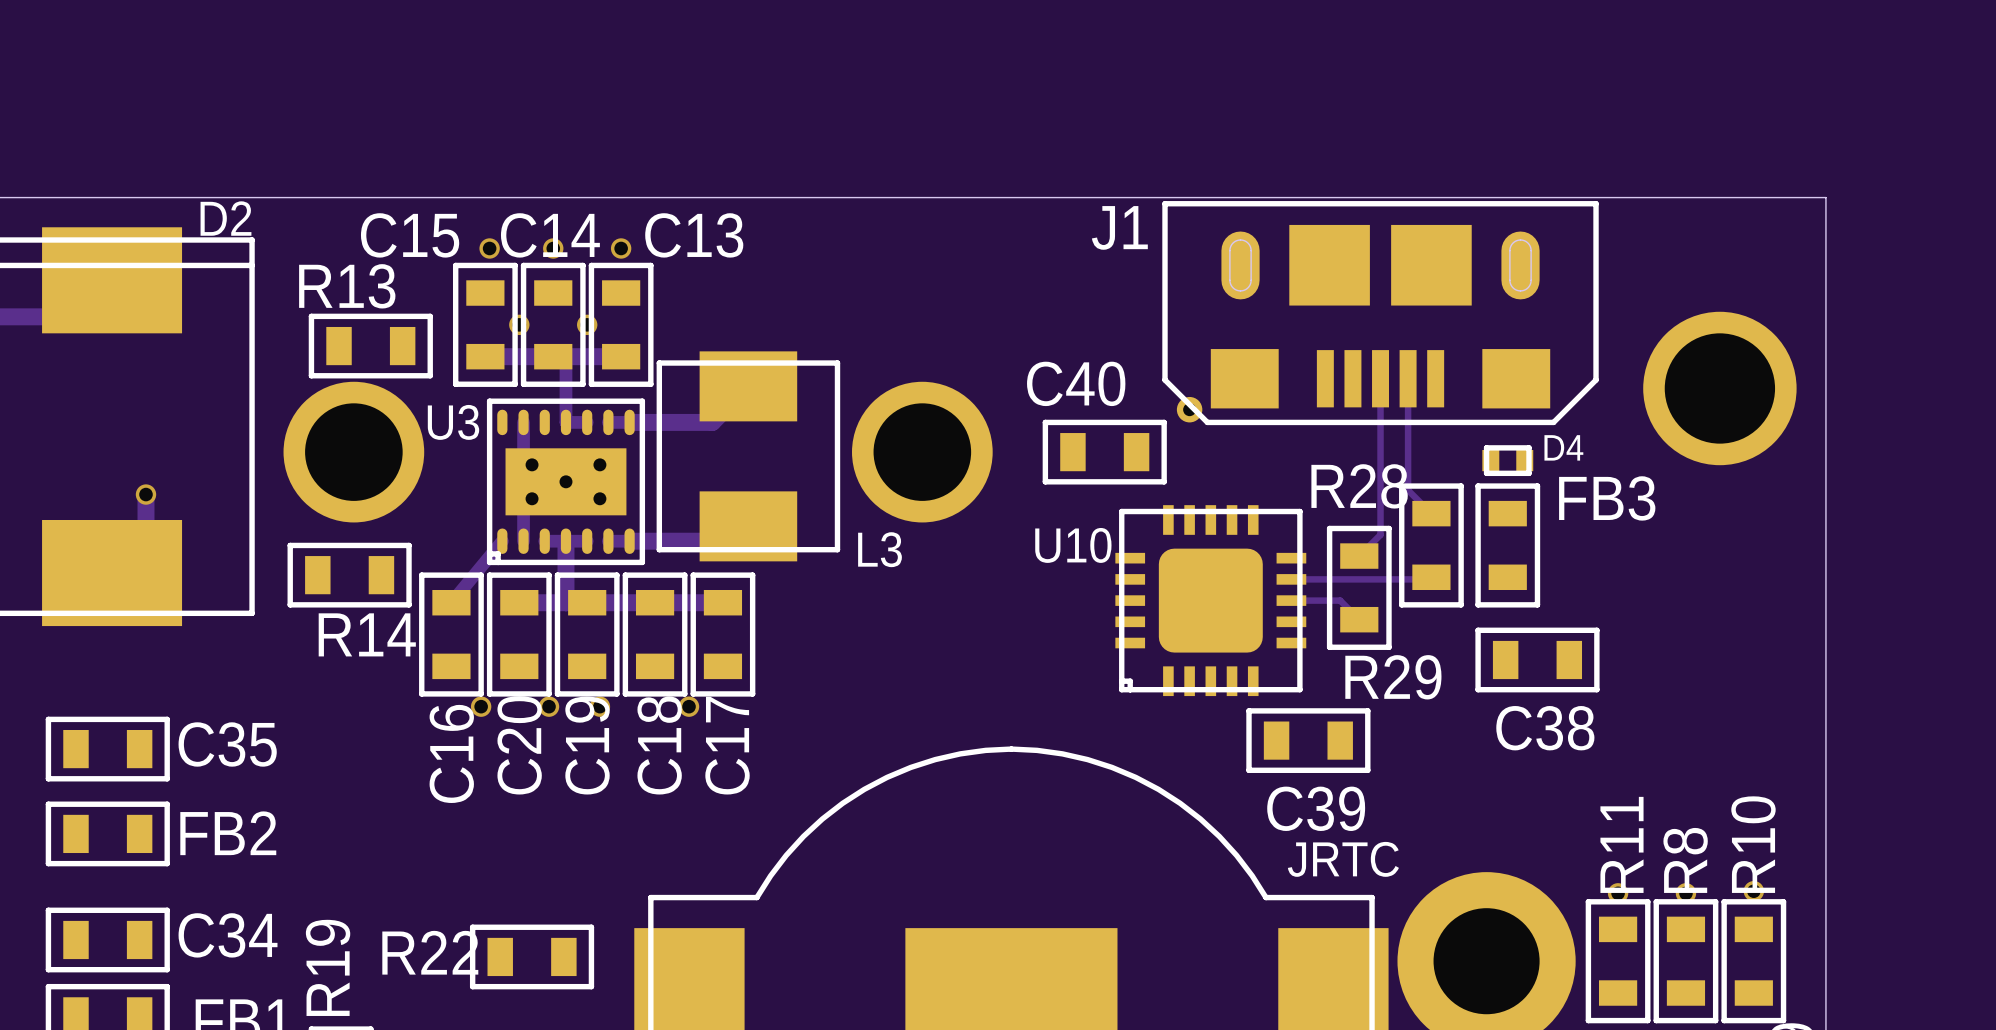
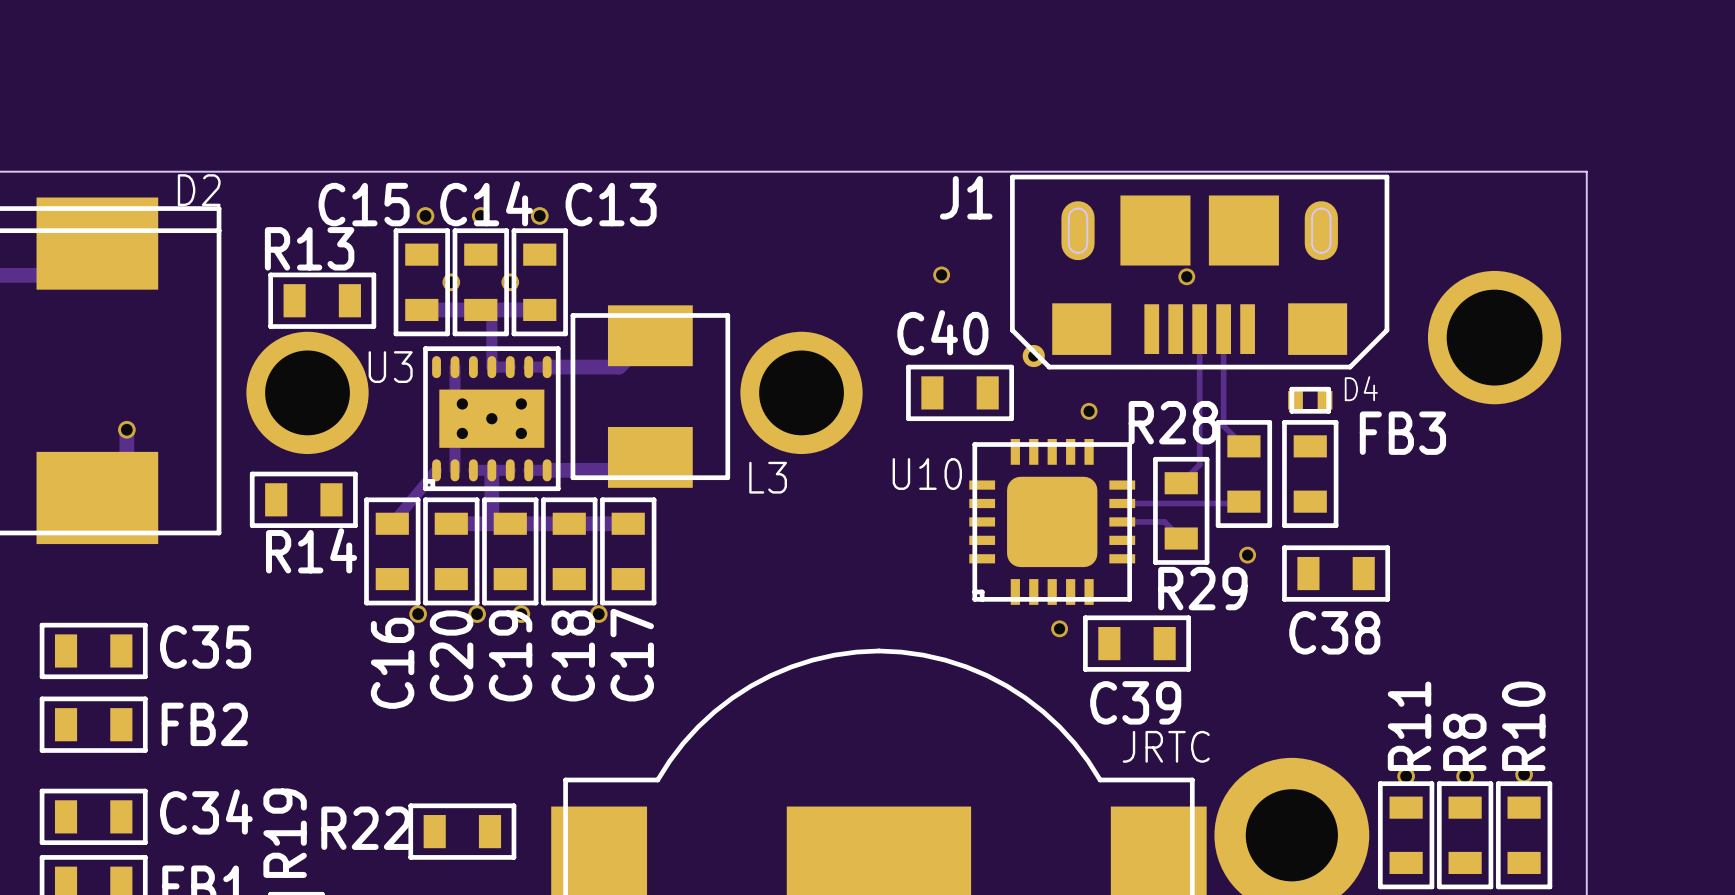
via: none -> (941, 274)
via: none -> (1186, 276)
via: none -> (1089, 411)
via: none -> (1247, 555)
via: none -> (1059, 628)

